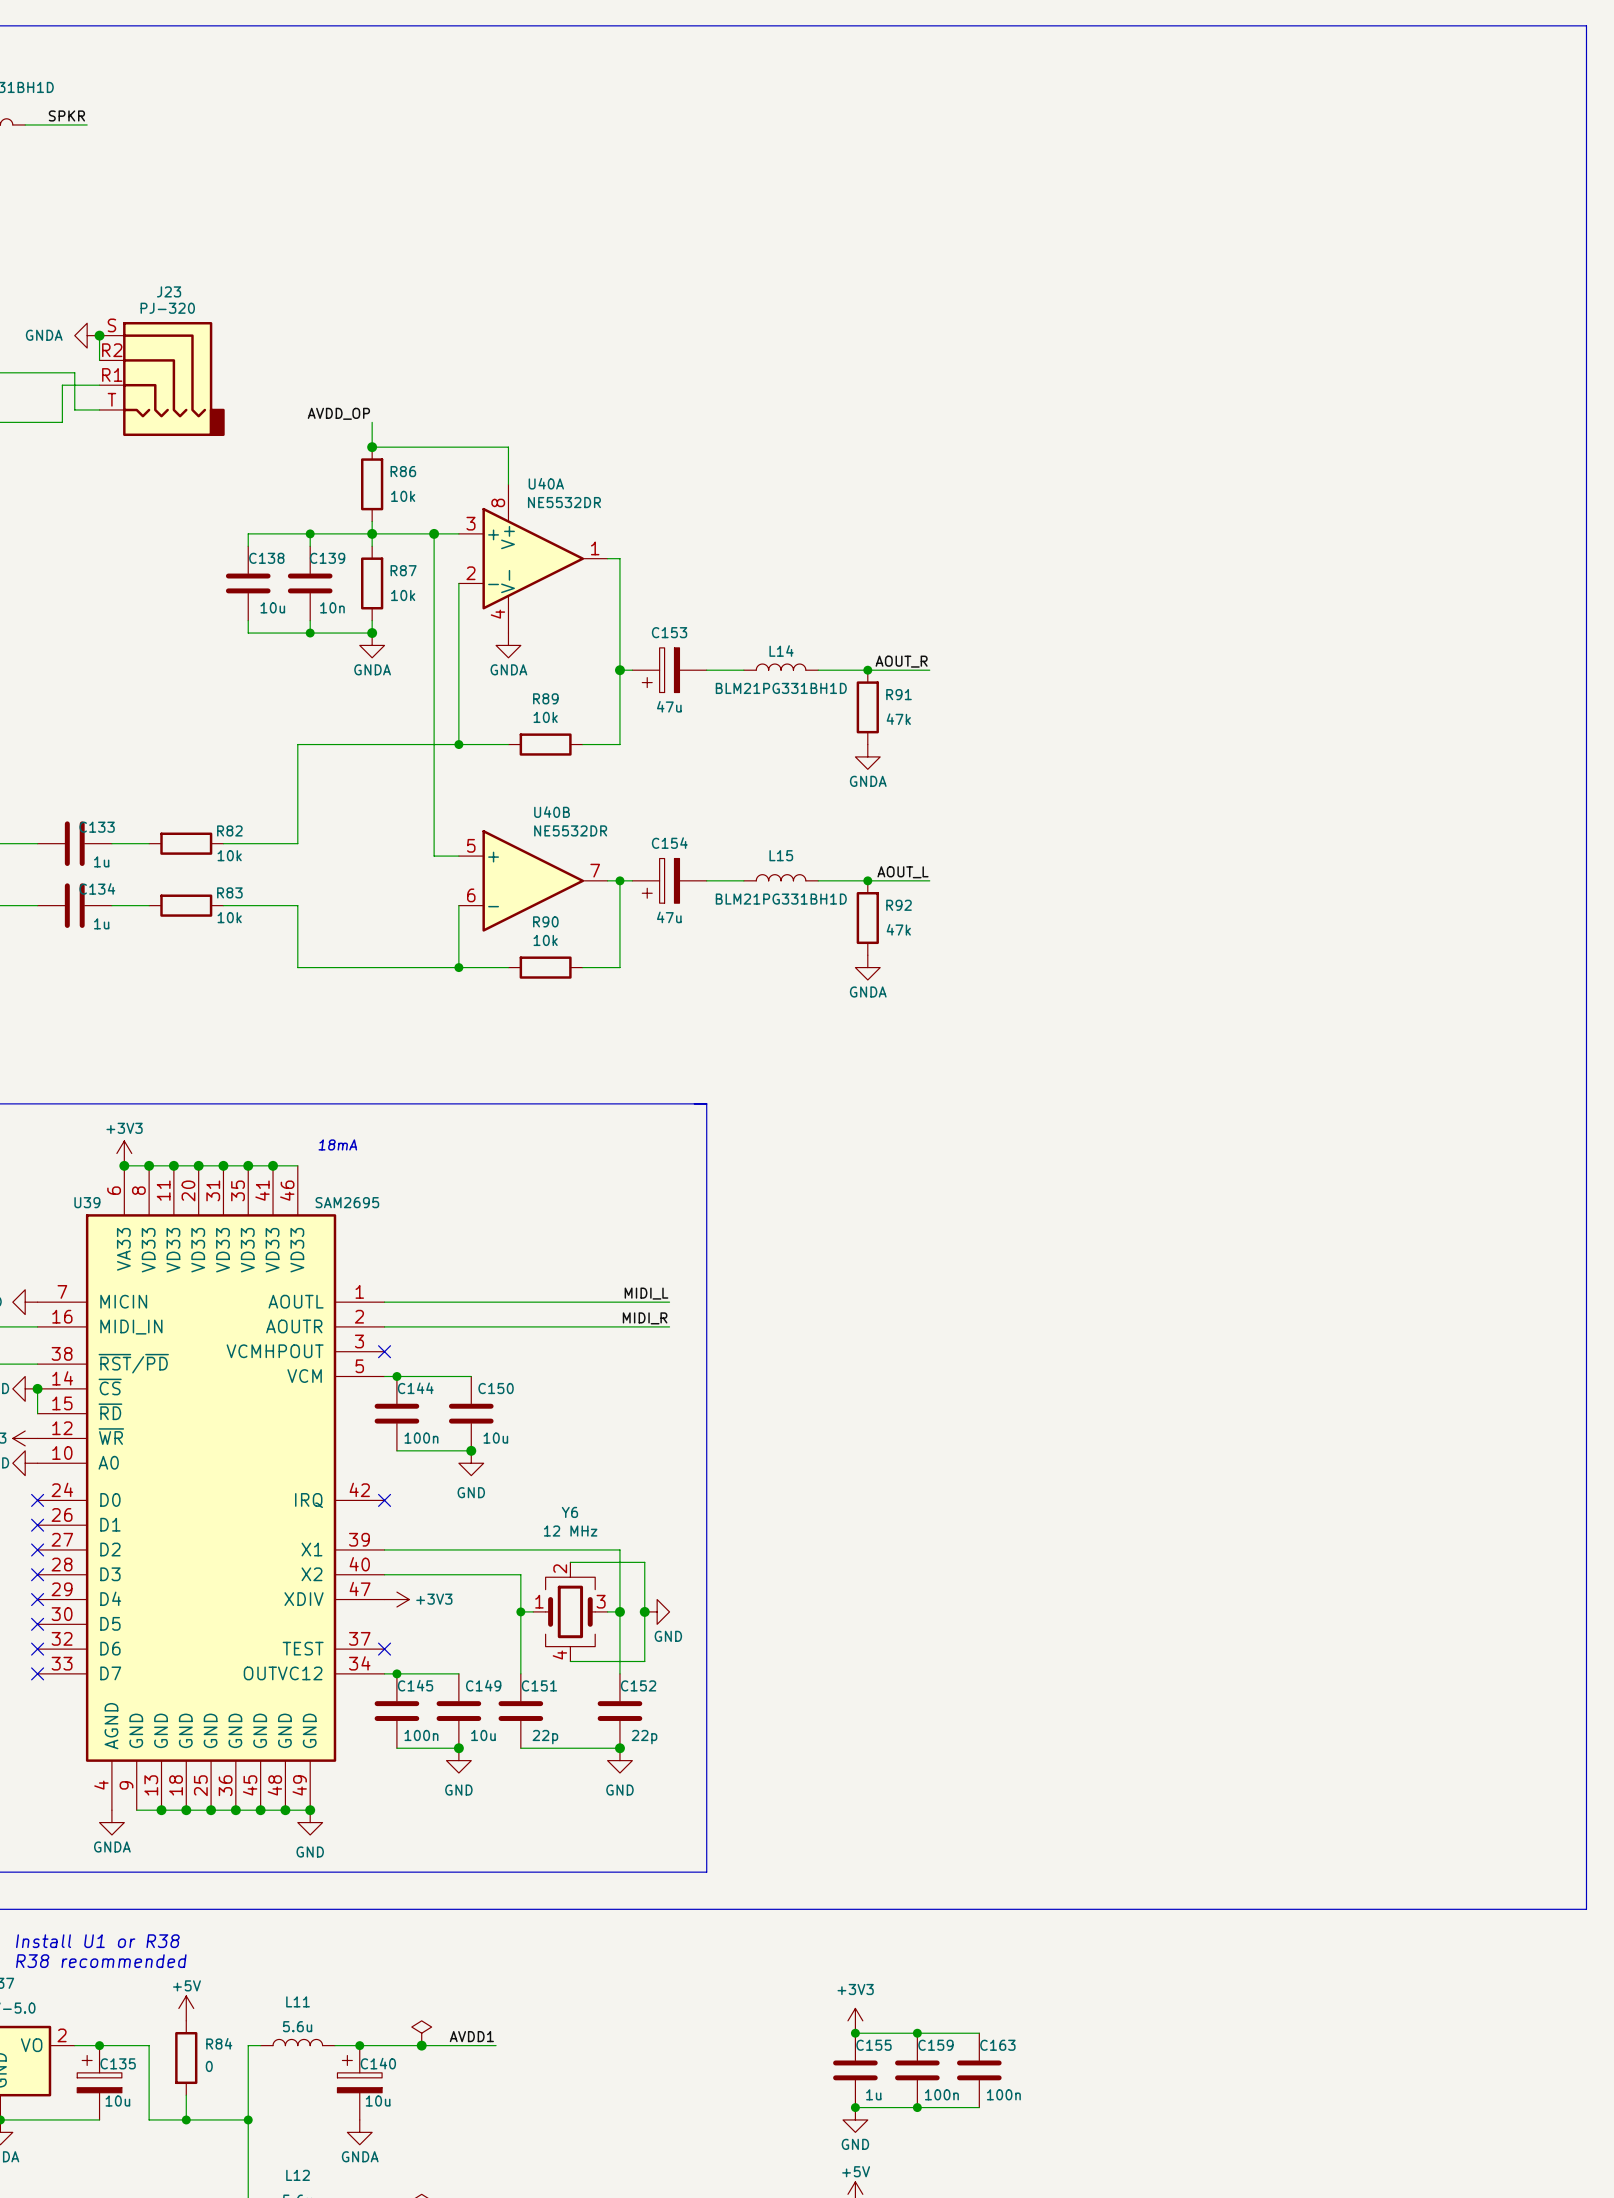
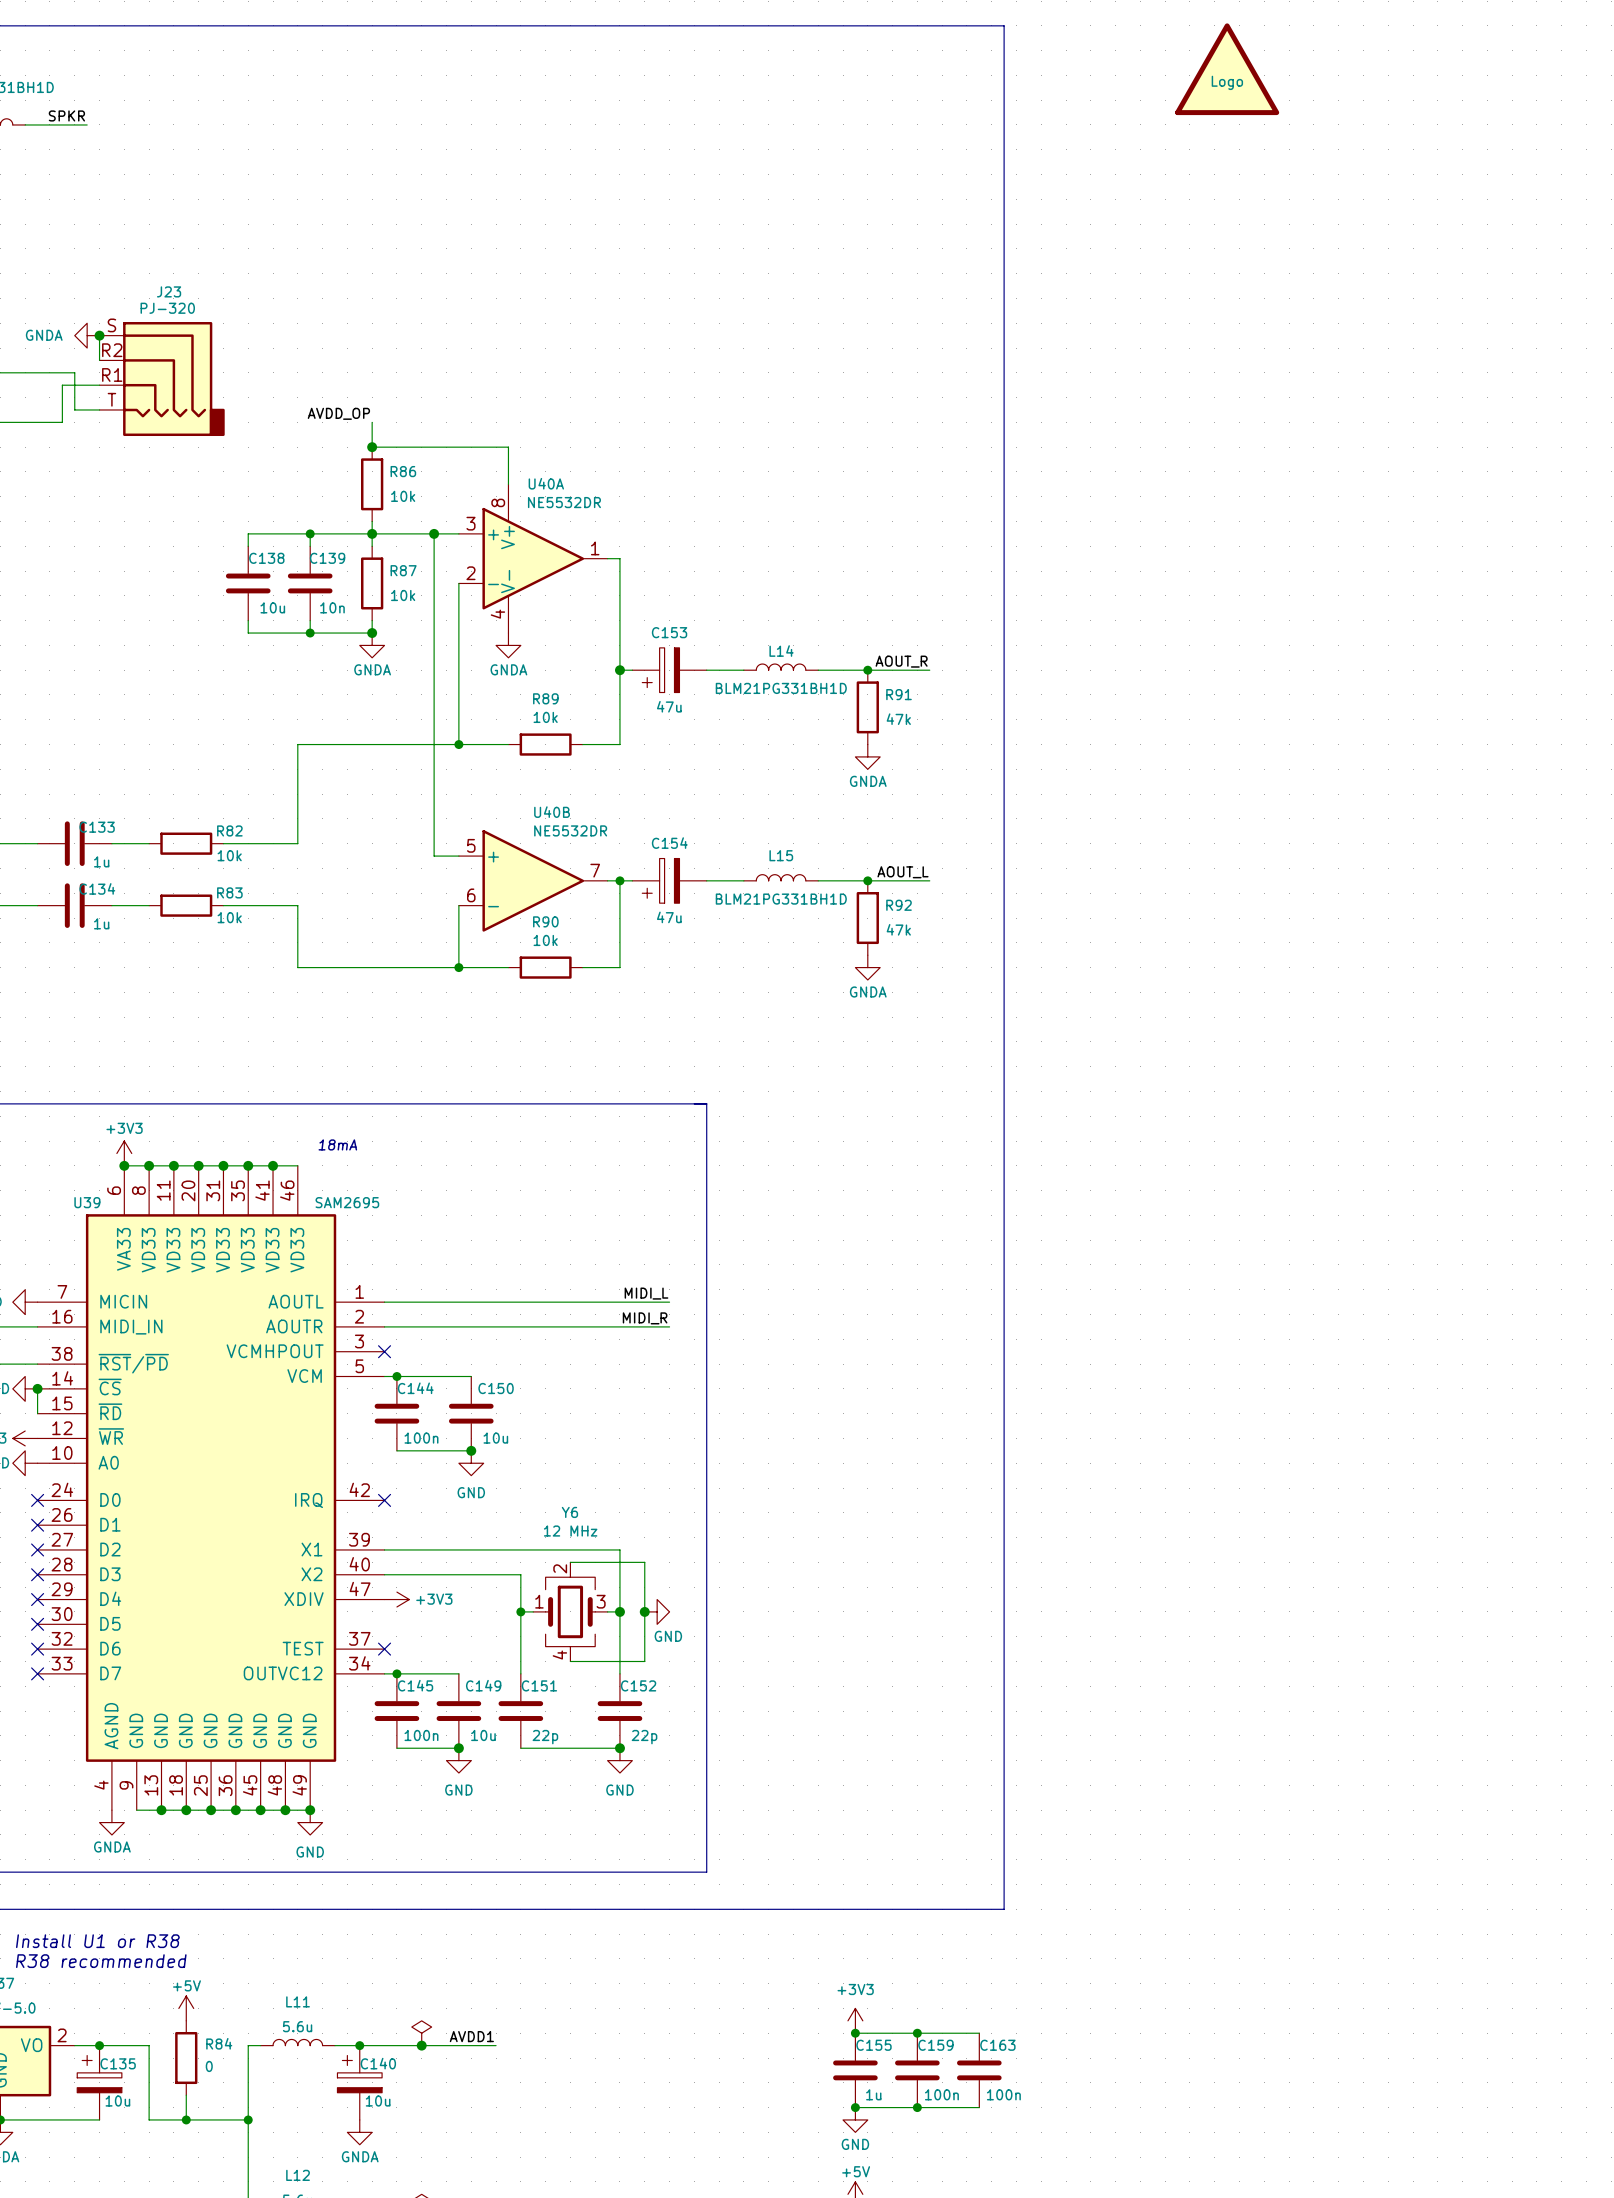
line: (1004, 25) (1586, 25) (1586, 1909) (1004, 1909) -> (1004, 25) (1004, 1909)
part: none -> (1227, 69)

